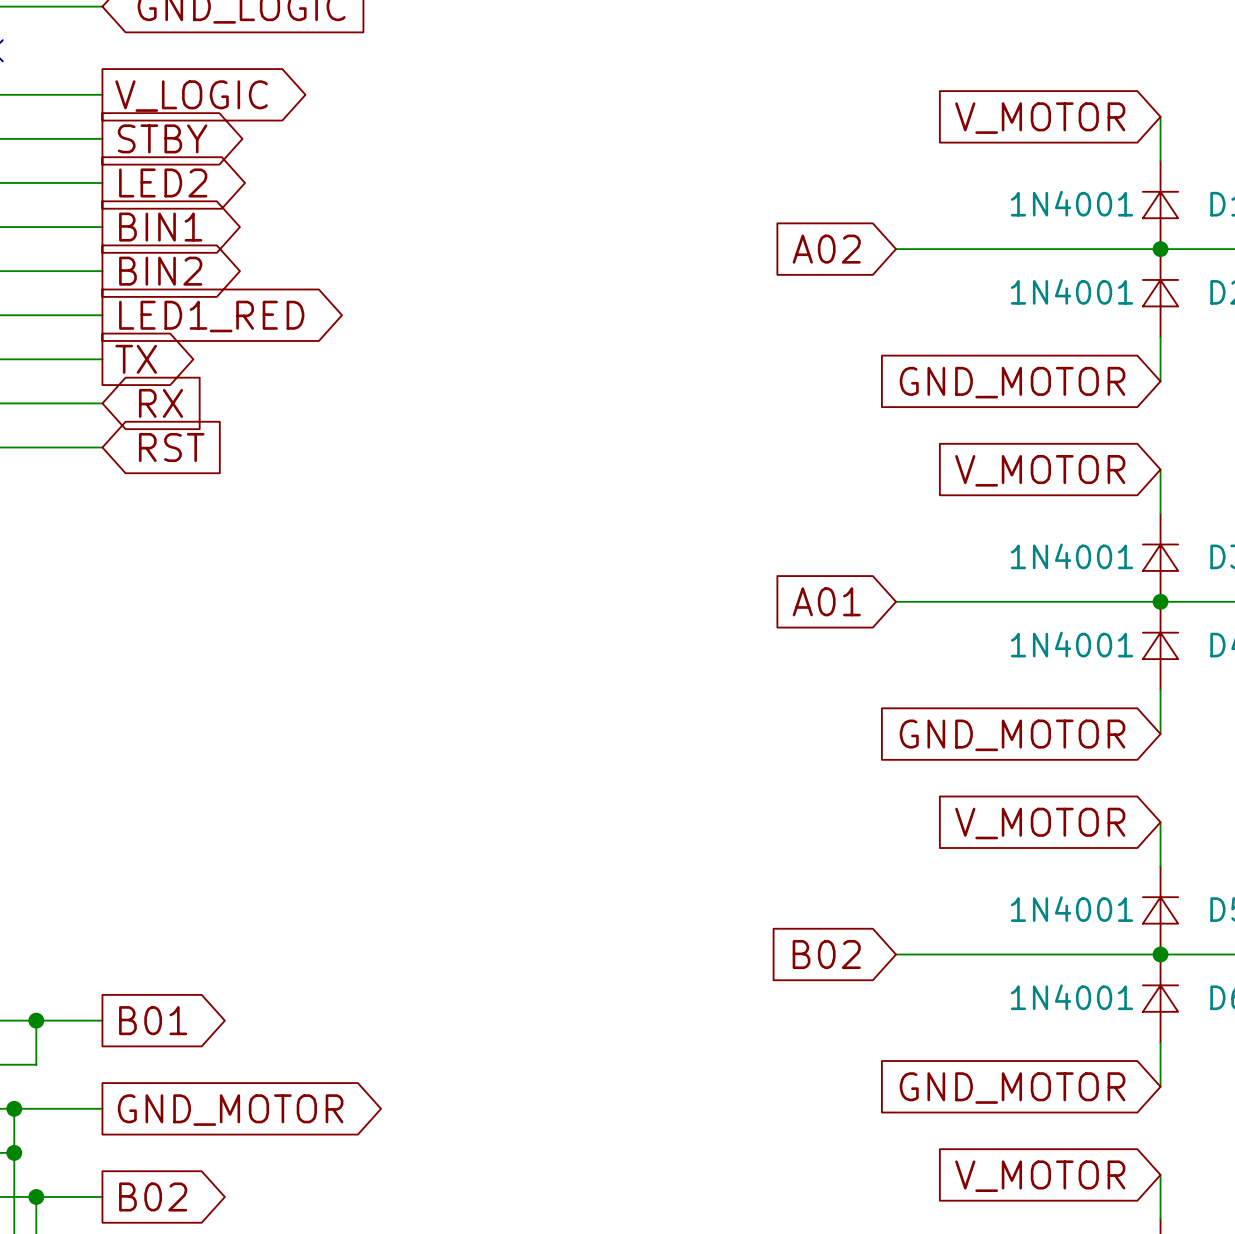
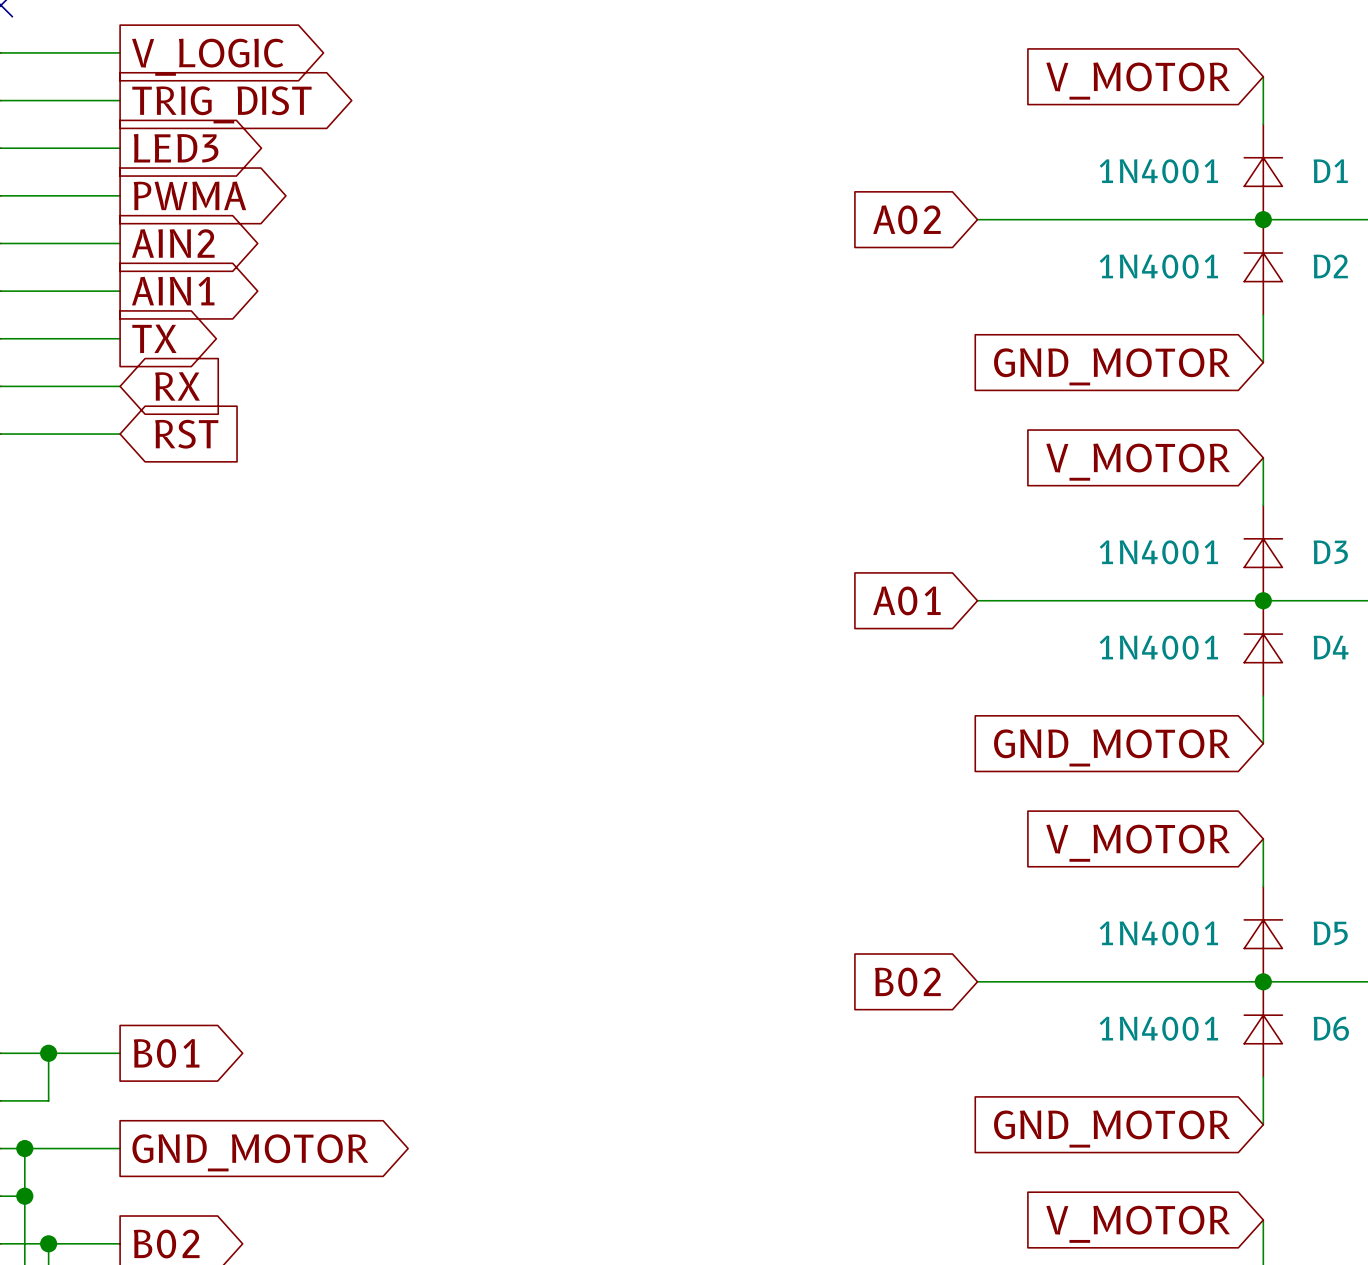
global label: STBY (162, 138) -> TRIG_DIST (221, 104)
global label: LED2 (163, 182) -> LED3 (176, 148)
global label: BIN1 (160, 227) -> PWMA (189, 195)
global label: BIN2 (160, 271) -> AIN2 (173, 243)
global label: LED1_RED (211, 316) -> AIN1 (173, 291)

